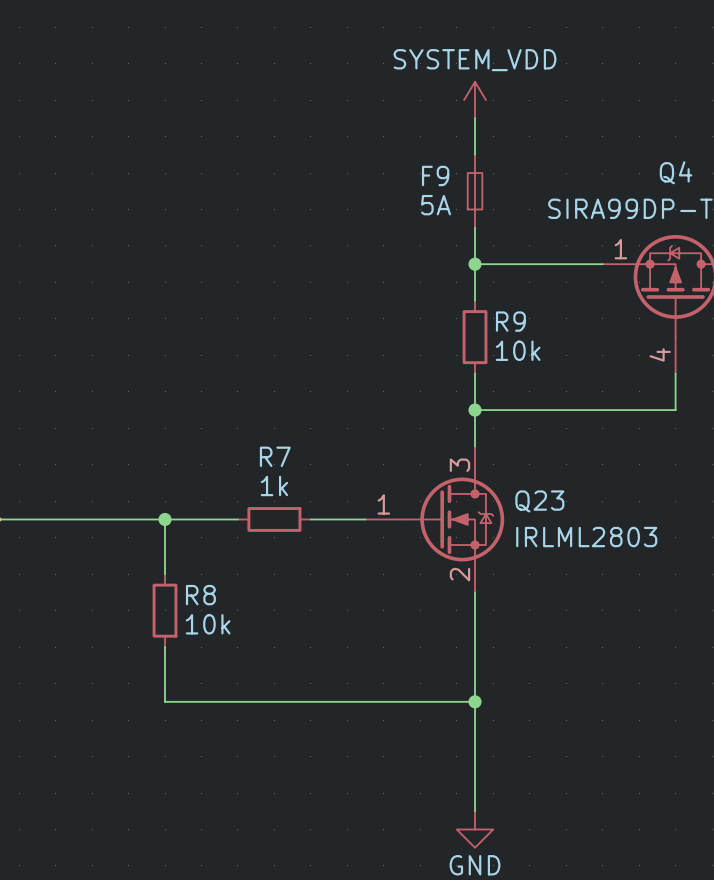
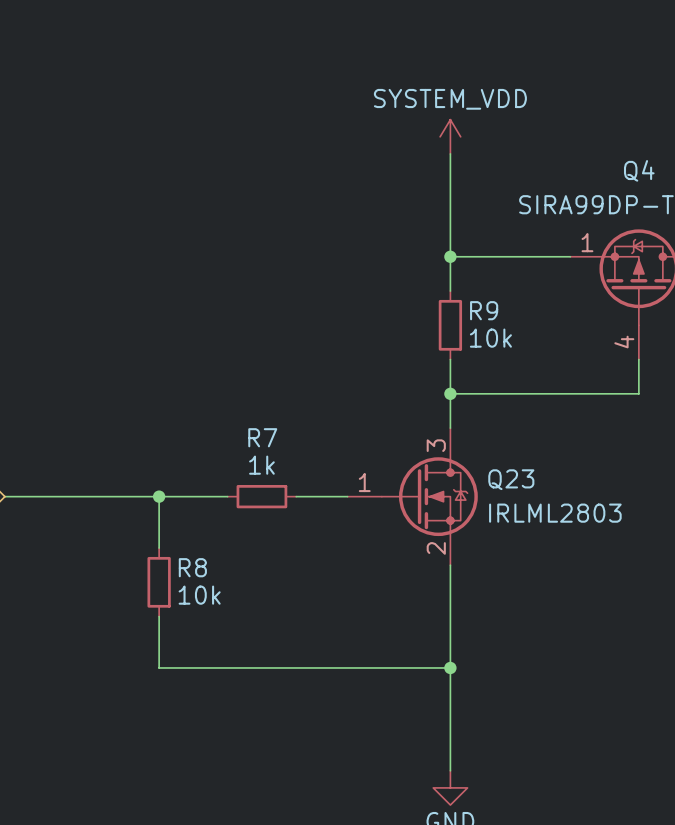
power symbol position: SYSTEM_VDD (475, 100) -> SYSTEM_VDD (450, 136)
F9: 5A (475, 191) -> none

